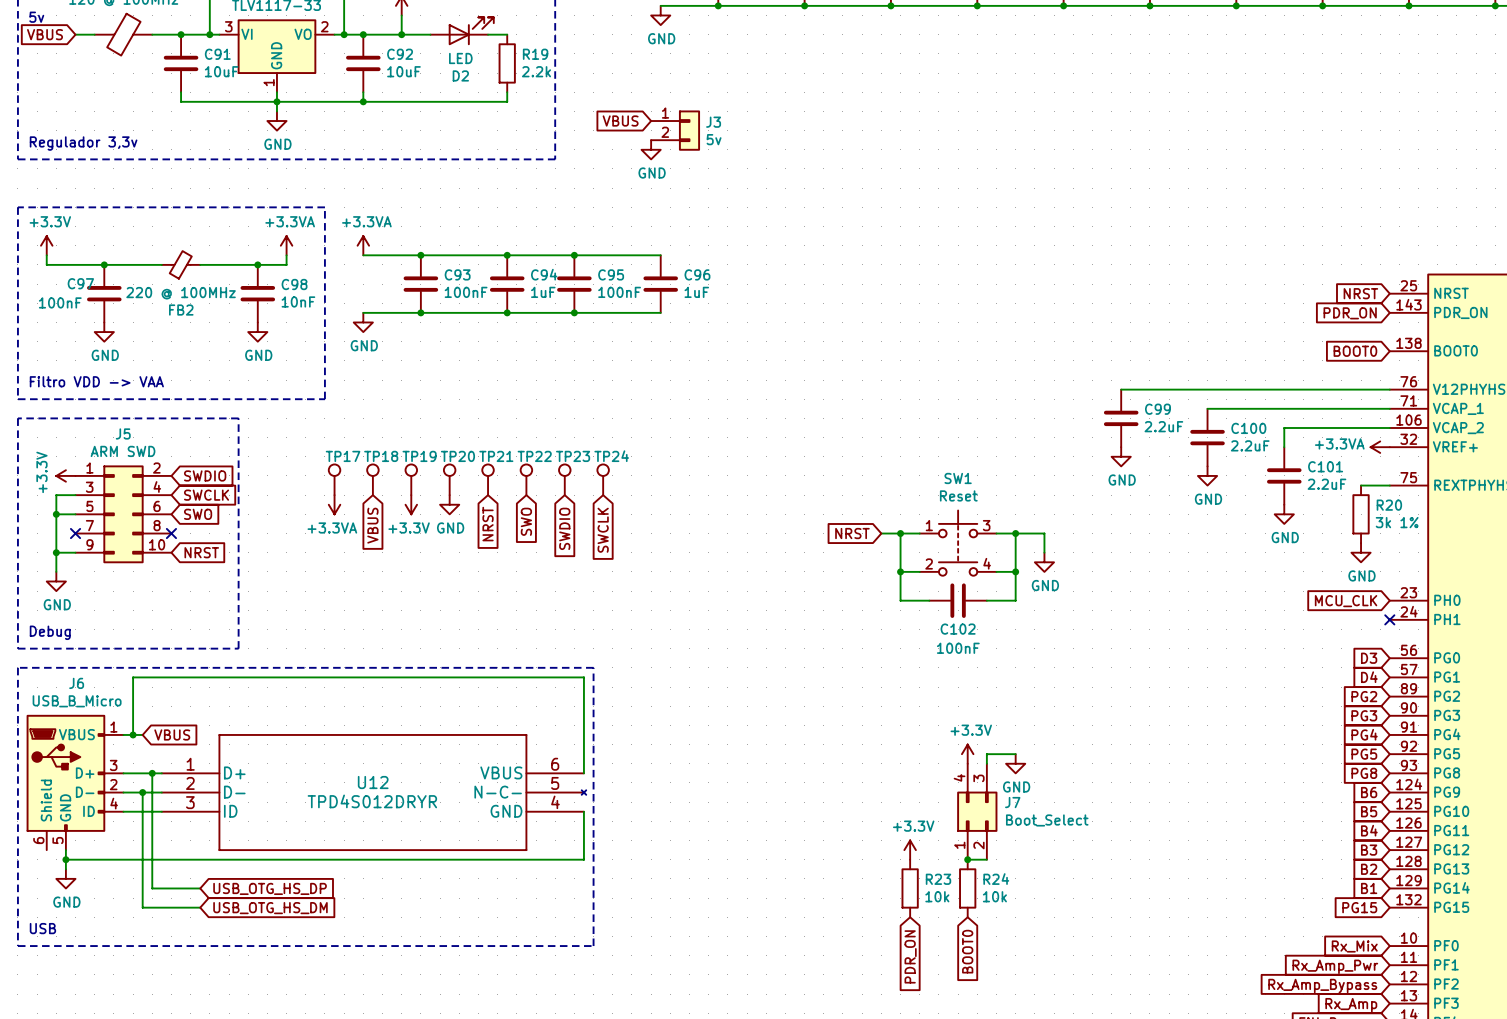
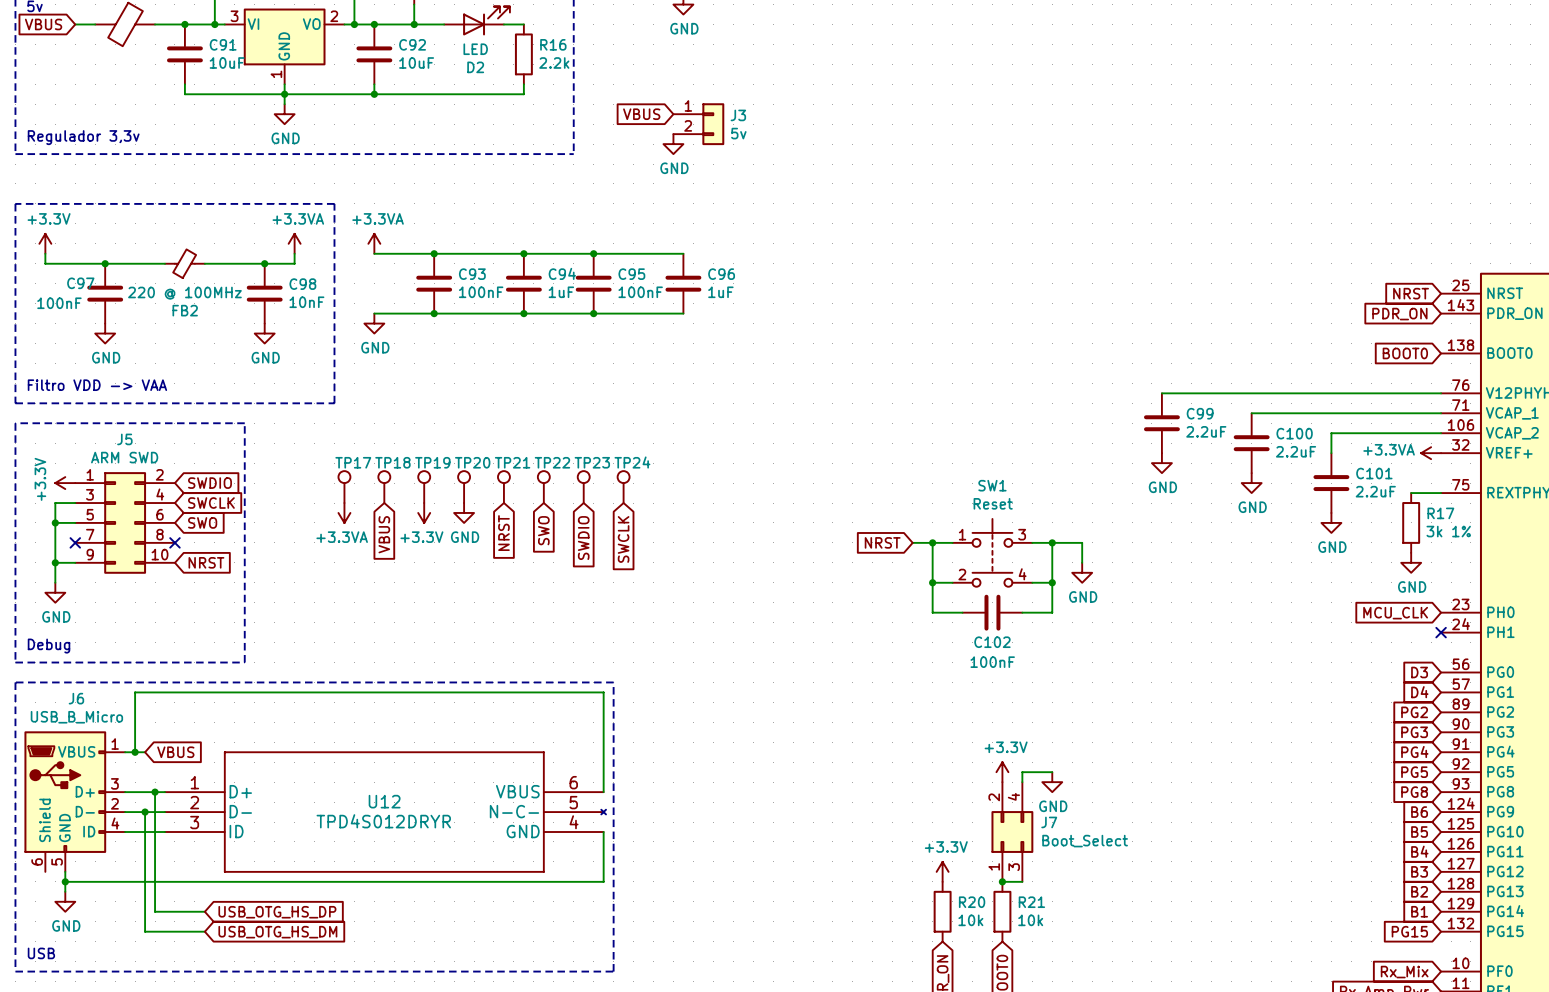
R19 name: R19 (535, 54) -> R16 (553, 44)
R20 name: R20 (1389, 505) -> R17 (1440, 513)
J7 pin number: 4 (959, 777) -> 2 (994, 797)
J7 pin number: 3 (978, 778) -> 4 (1013, 796)
J7 pin number: 2 (978, 845) -> 3 (1014, 867)
R23 name: R23 (938, 879) -> R20 (972, 902)
R24 name: R24 (996, 879) -> R21 (1031, 902)

